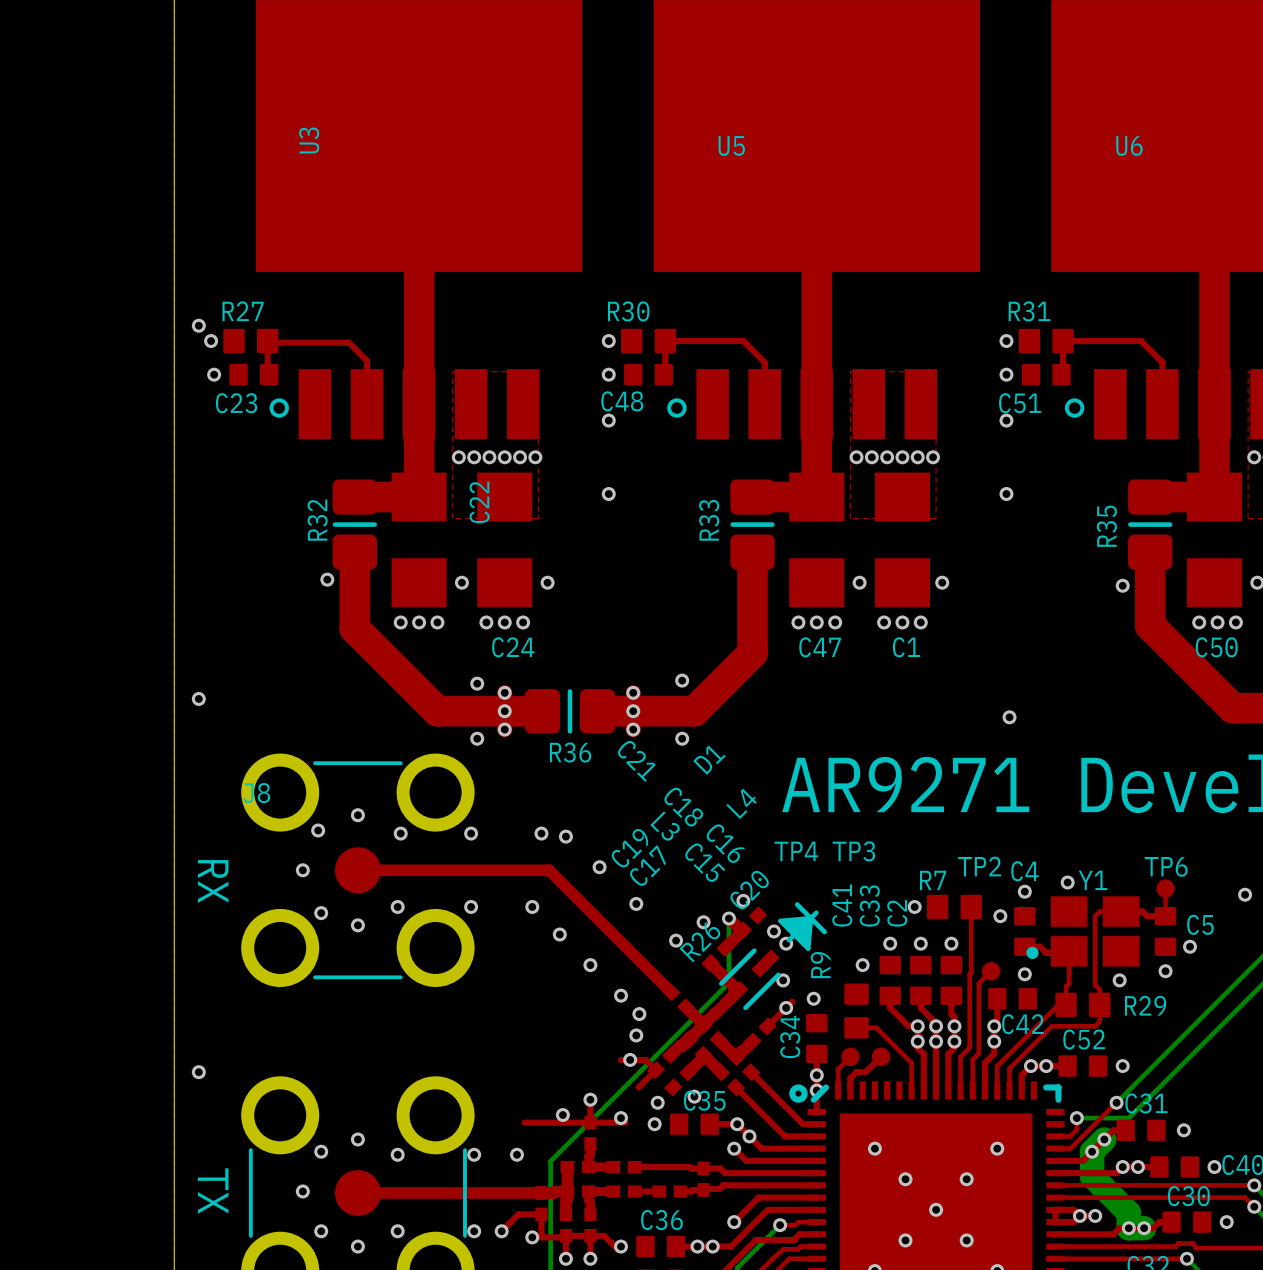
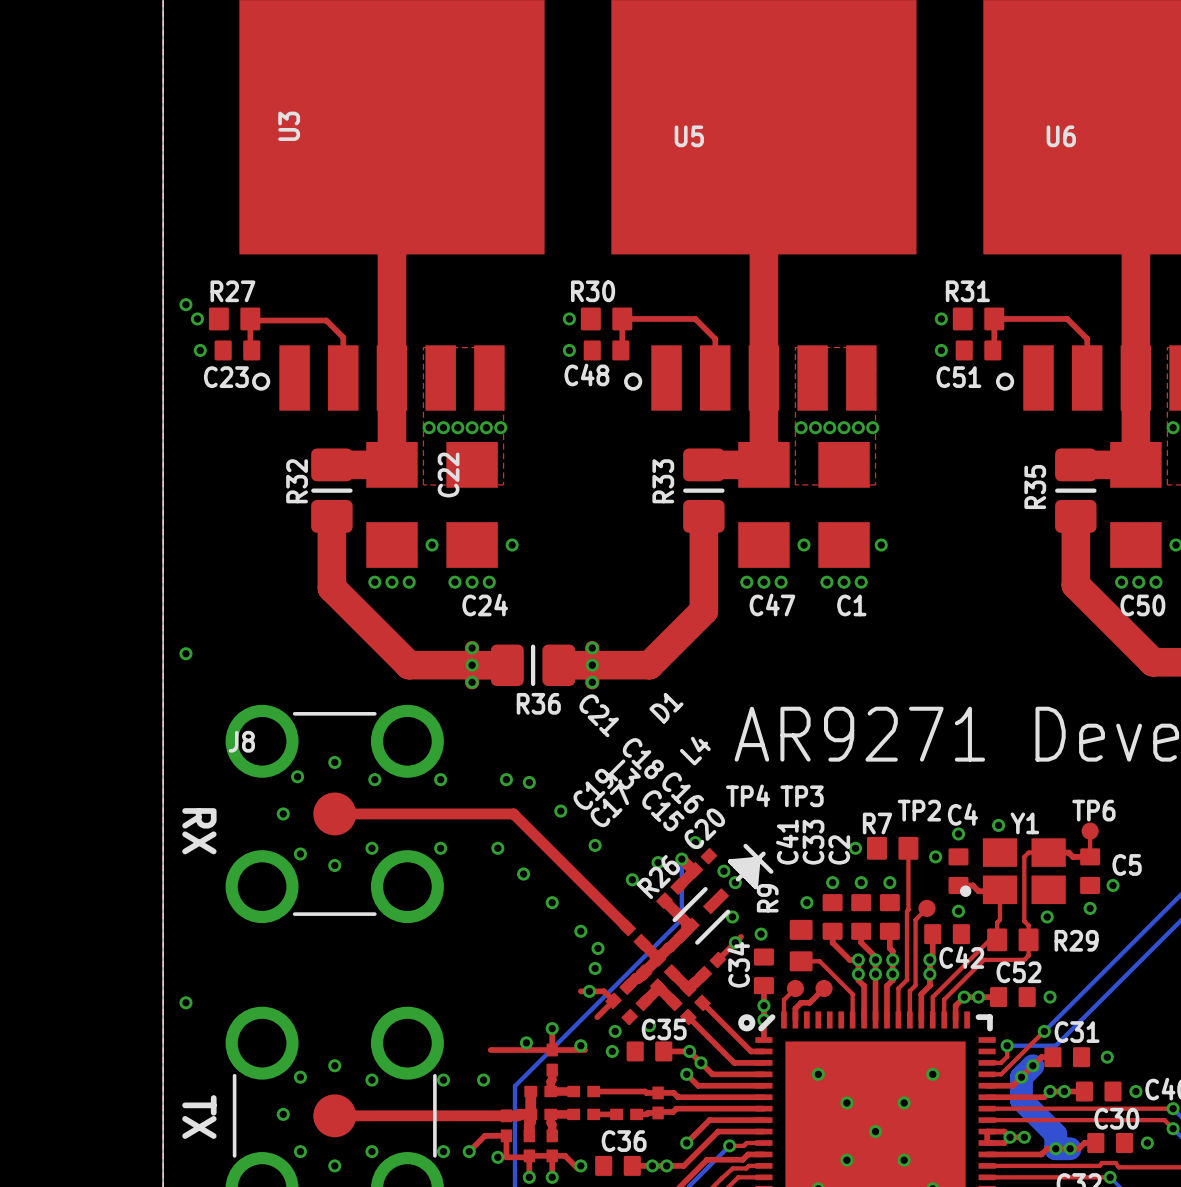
via: (608, 420) -> none
via: (1006, 420) -> none
via: (608, 493) -> none
via: (1006, 493) -> none
via: (327, 579) -> none
via: (1122, 585) -> none
via: (682, 680) -> none
via: (477, 683) -> none
via: (1009, 717) -> none
via: (477, 738) -> none
via: (682, 738) -> none
via: (1245, 894) -> none

